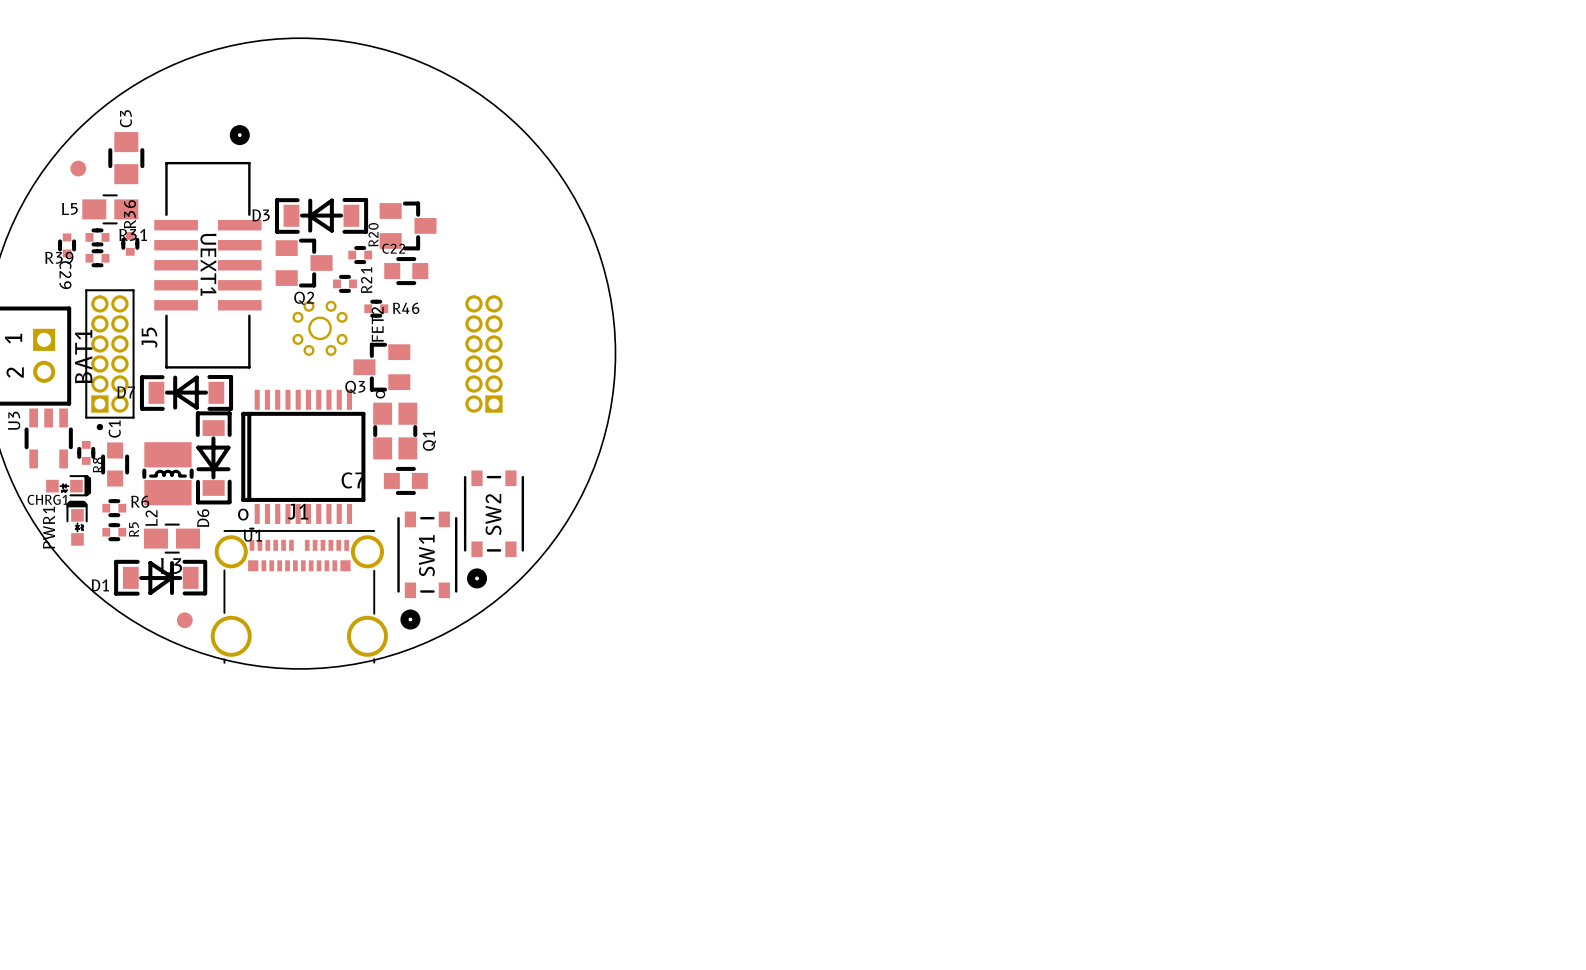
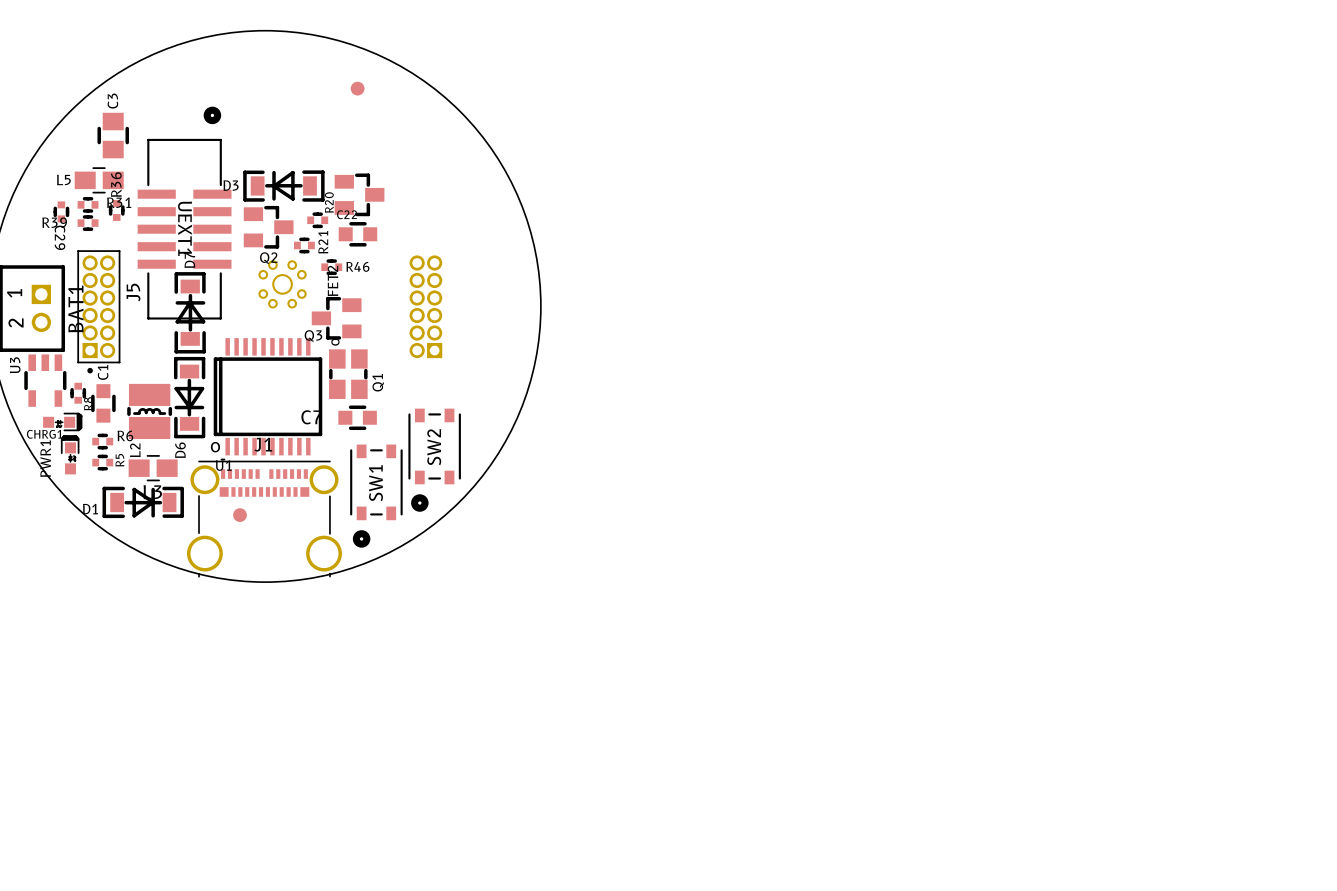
part: none -> (357, 88)
part: (78, 168) -> none
D7 rotation: 0° (186, 392) -> 90° clockwise (190, 312)
part position: (184, 620) -> (239, 515)

